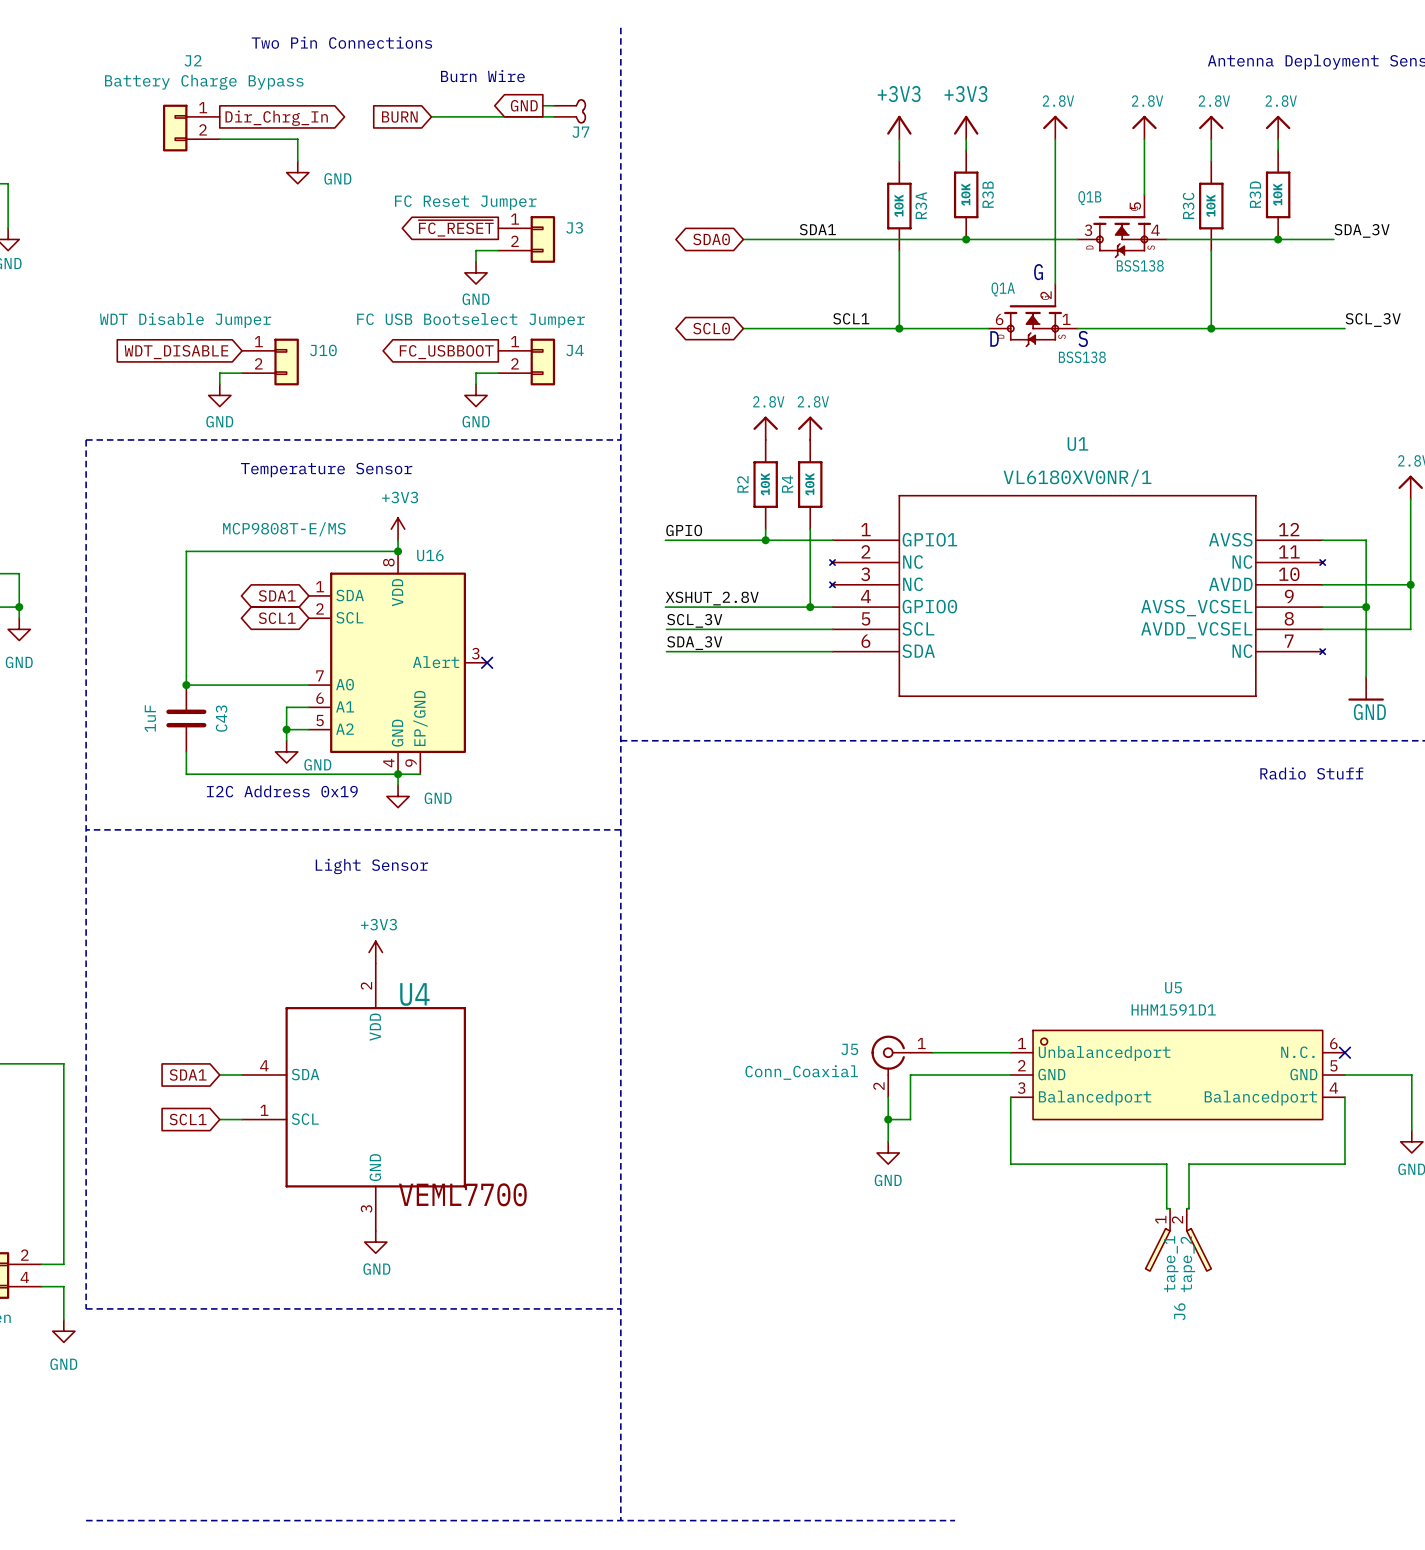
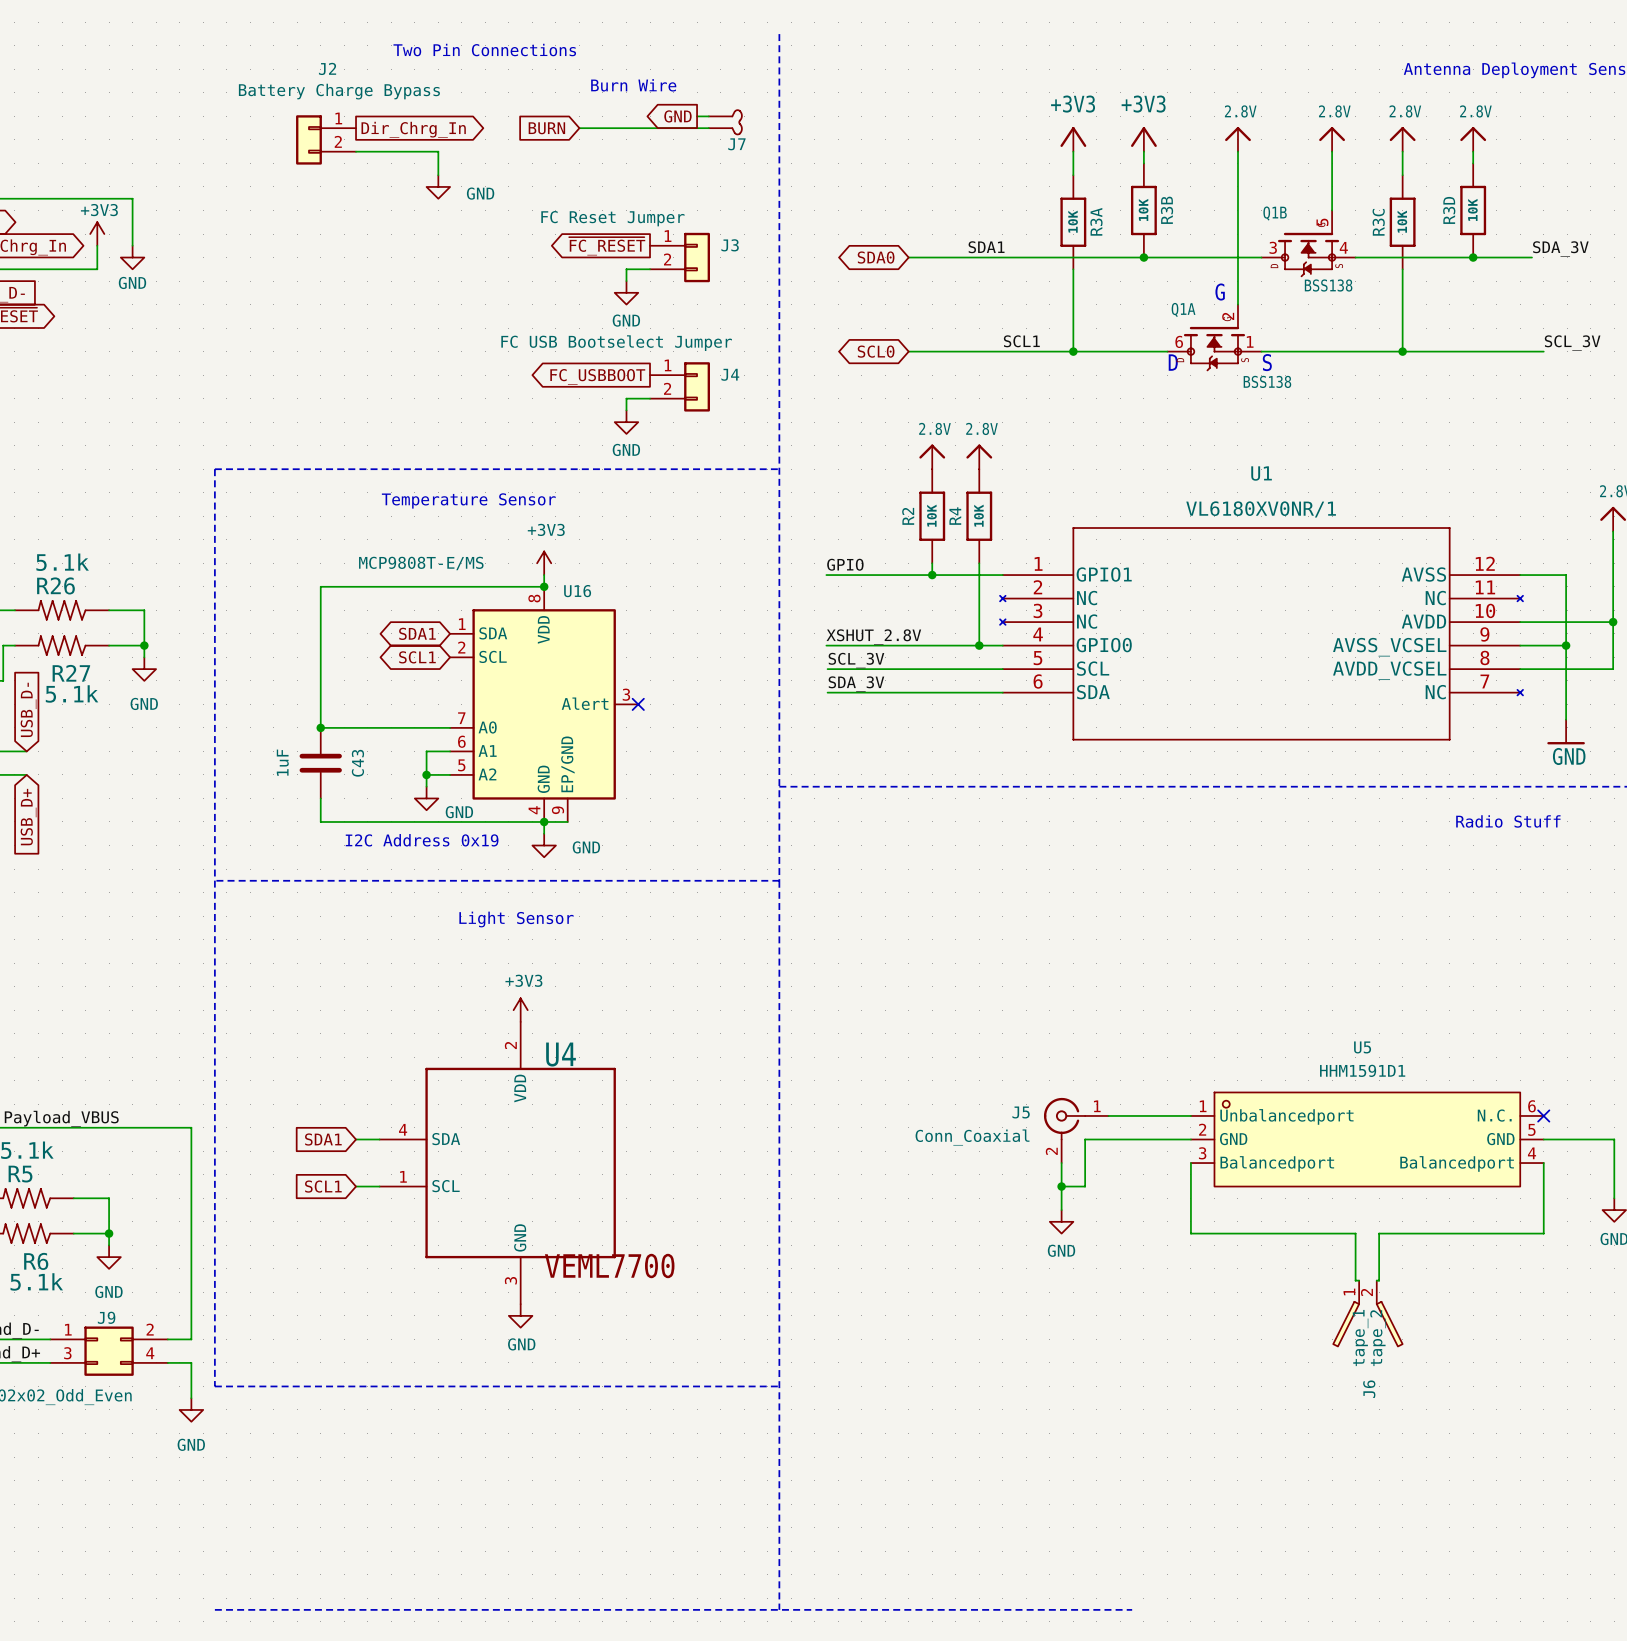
global label: WDT_DISABLE (176, 352) -> none
J10: WDT Disable Jumper (270, 362) -> none
wire: (242, 373) (219, 373) (219, 384) -> none
power symbol: GND (219, 395) -> none

